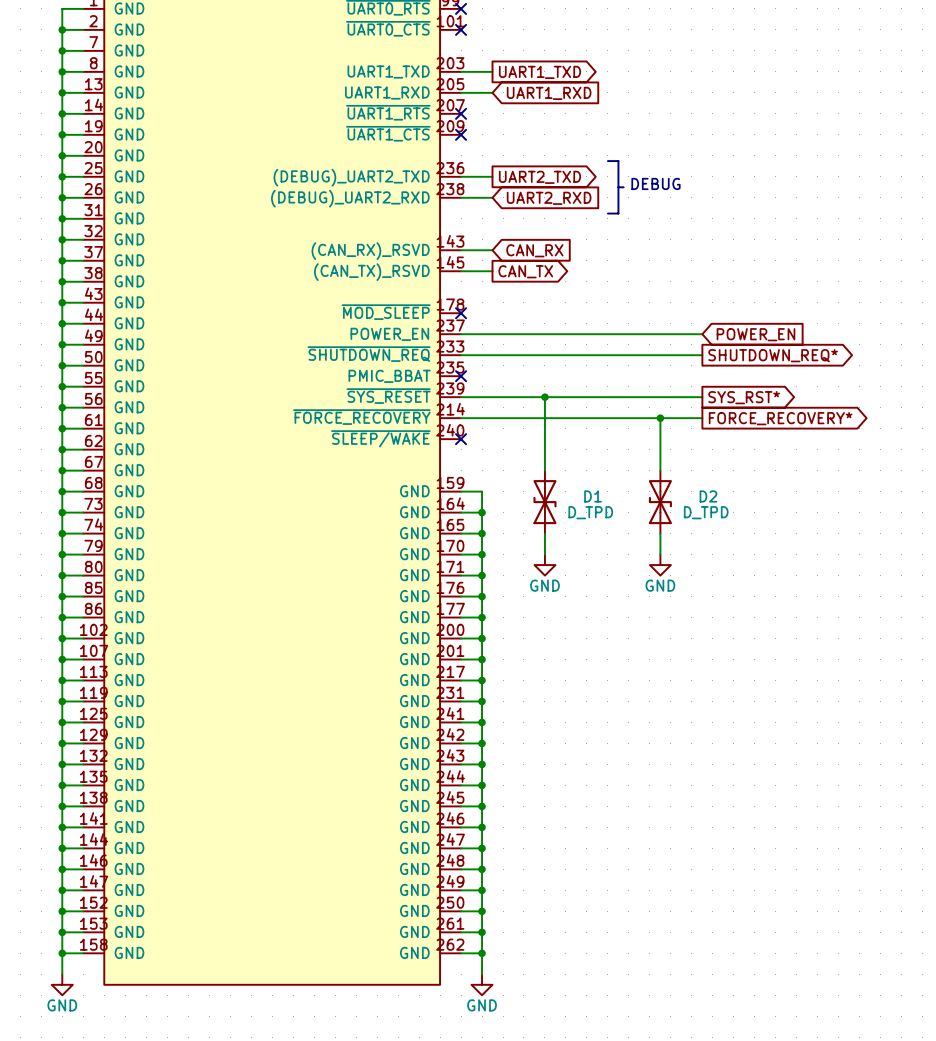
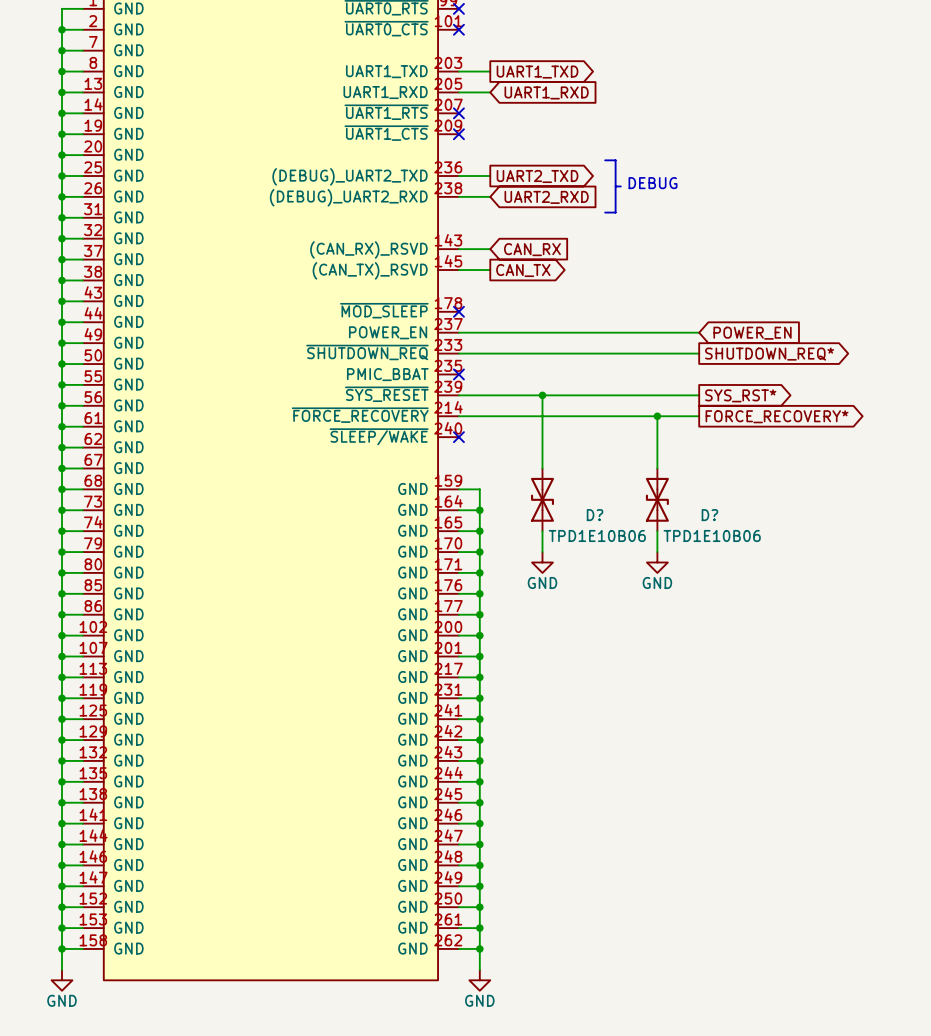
D1 name: D1 (593, 496) -> D? (595, 515)
D2 name: D2 (708, 496) -> D? (709, 515)
D1 value: D_TPD (590, 512) -> TPD1E10B06 (597, 535)
D2 value: D_TPD (706, 512) -> TPD1E10B06 (712, 535)

